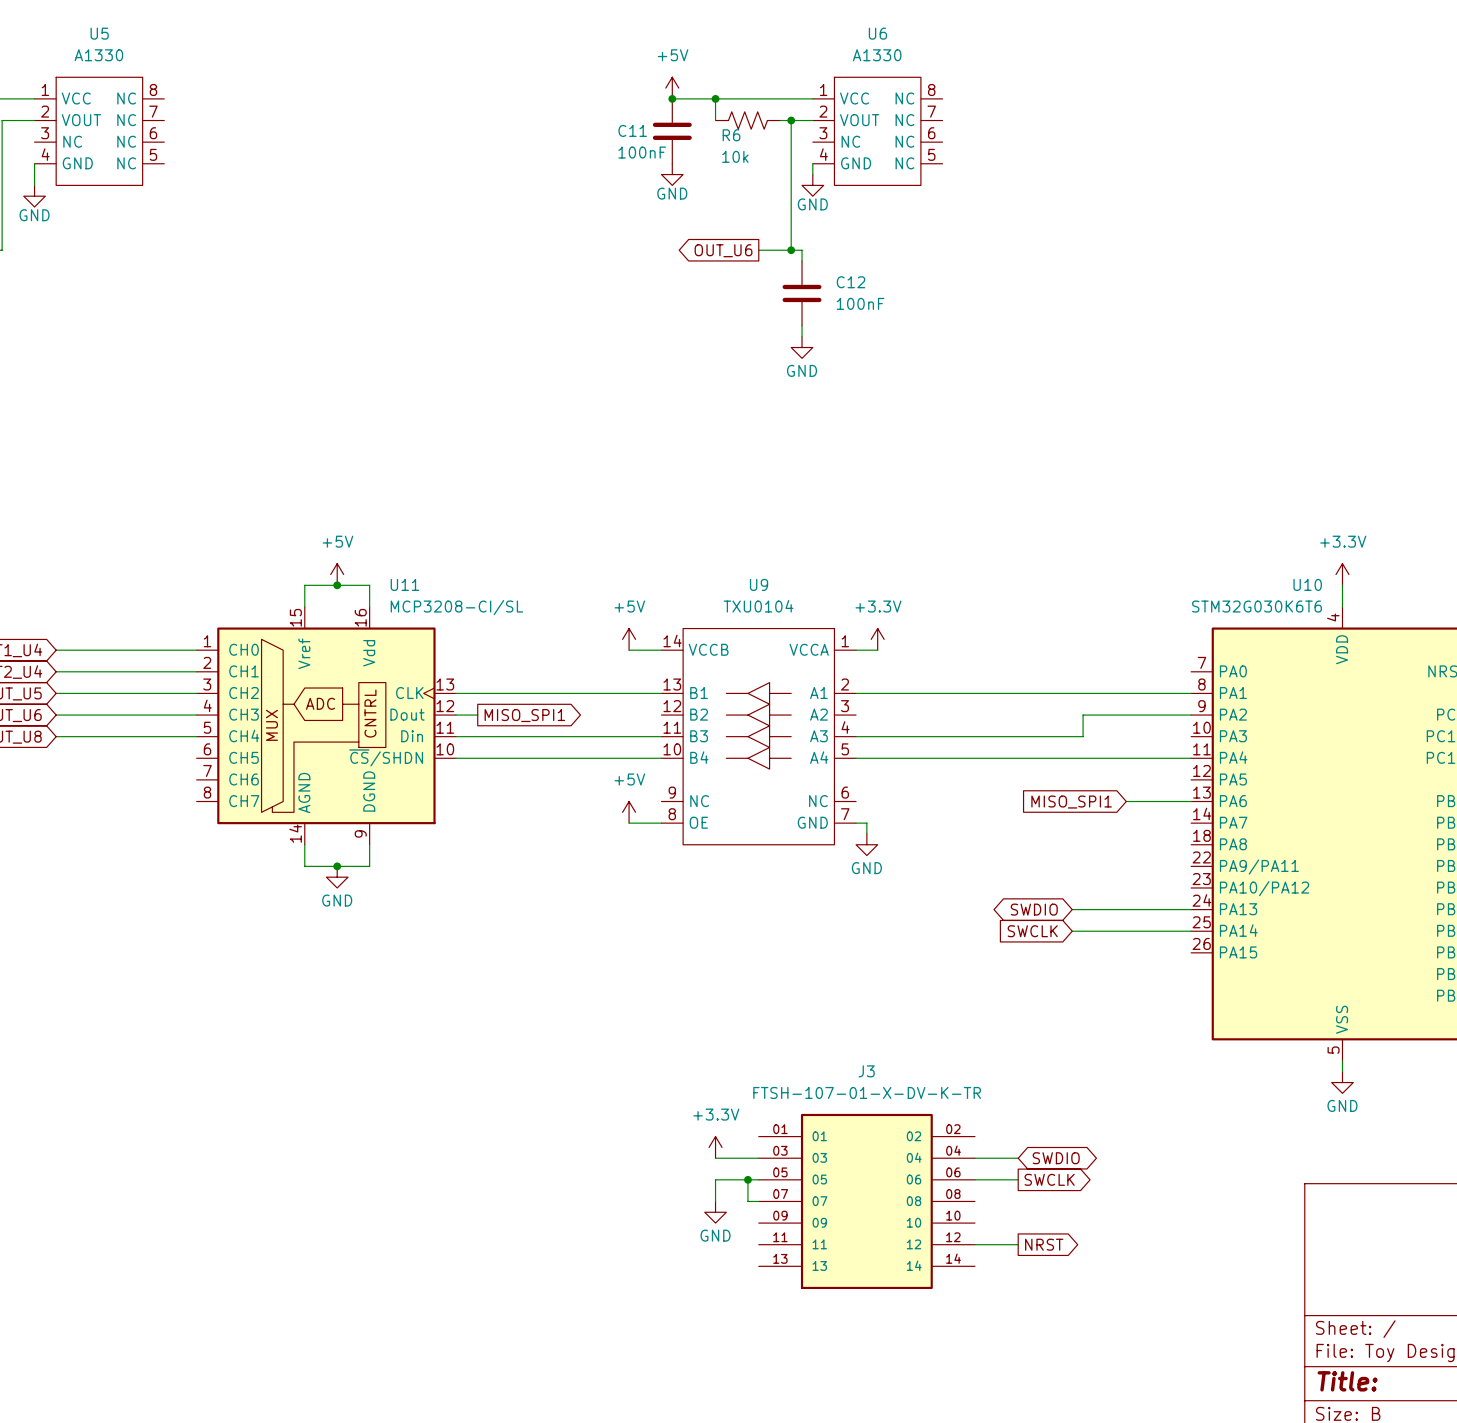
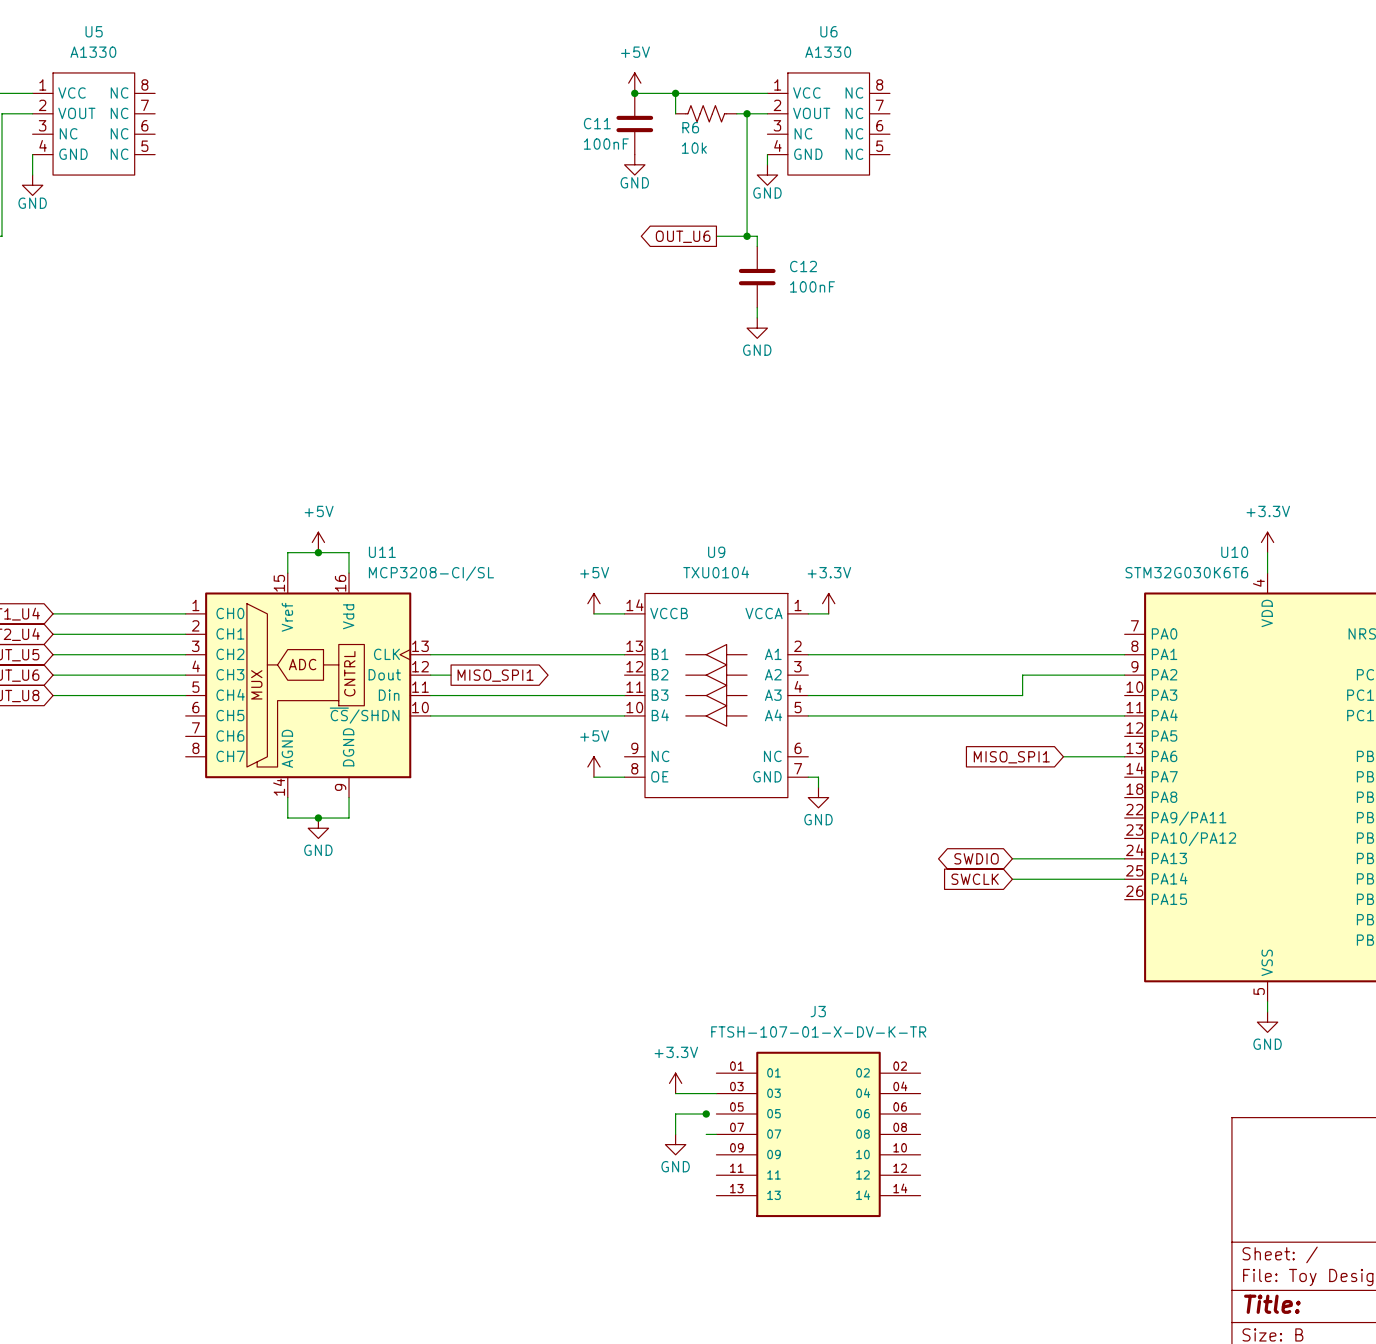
wire: (974, 1158) (1018, 1158) -> none
global label: SWDIO (1056, 1158) -> none
wire: (758, 1179) (747, 1179) (747, 1201) -> none
wire: (974, 1179) (1018, 1179) -> none
global label: SWCLK (1049, 1179) -> none
wire: (974, 1244) (1018, 1244) -> none
global label: NRST (1044, 1244) -> none

